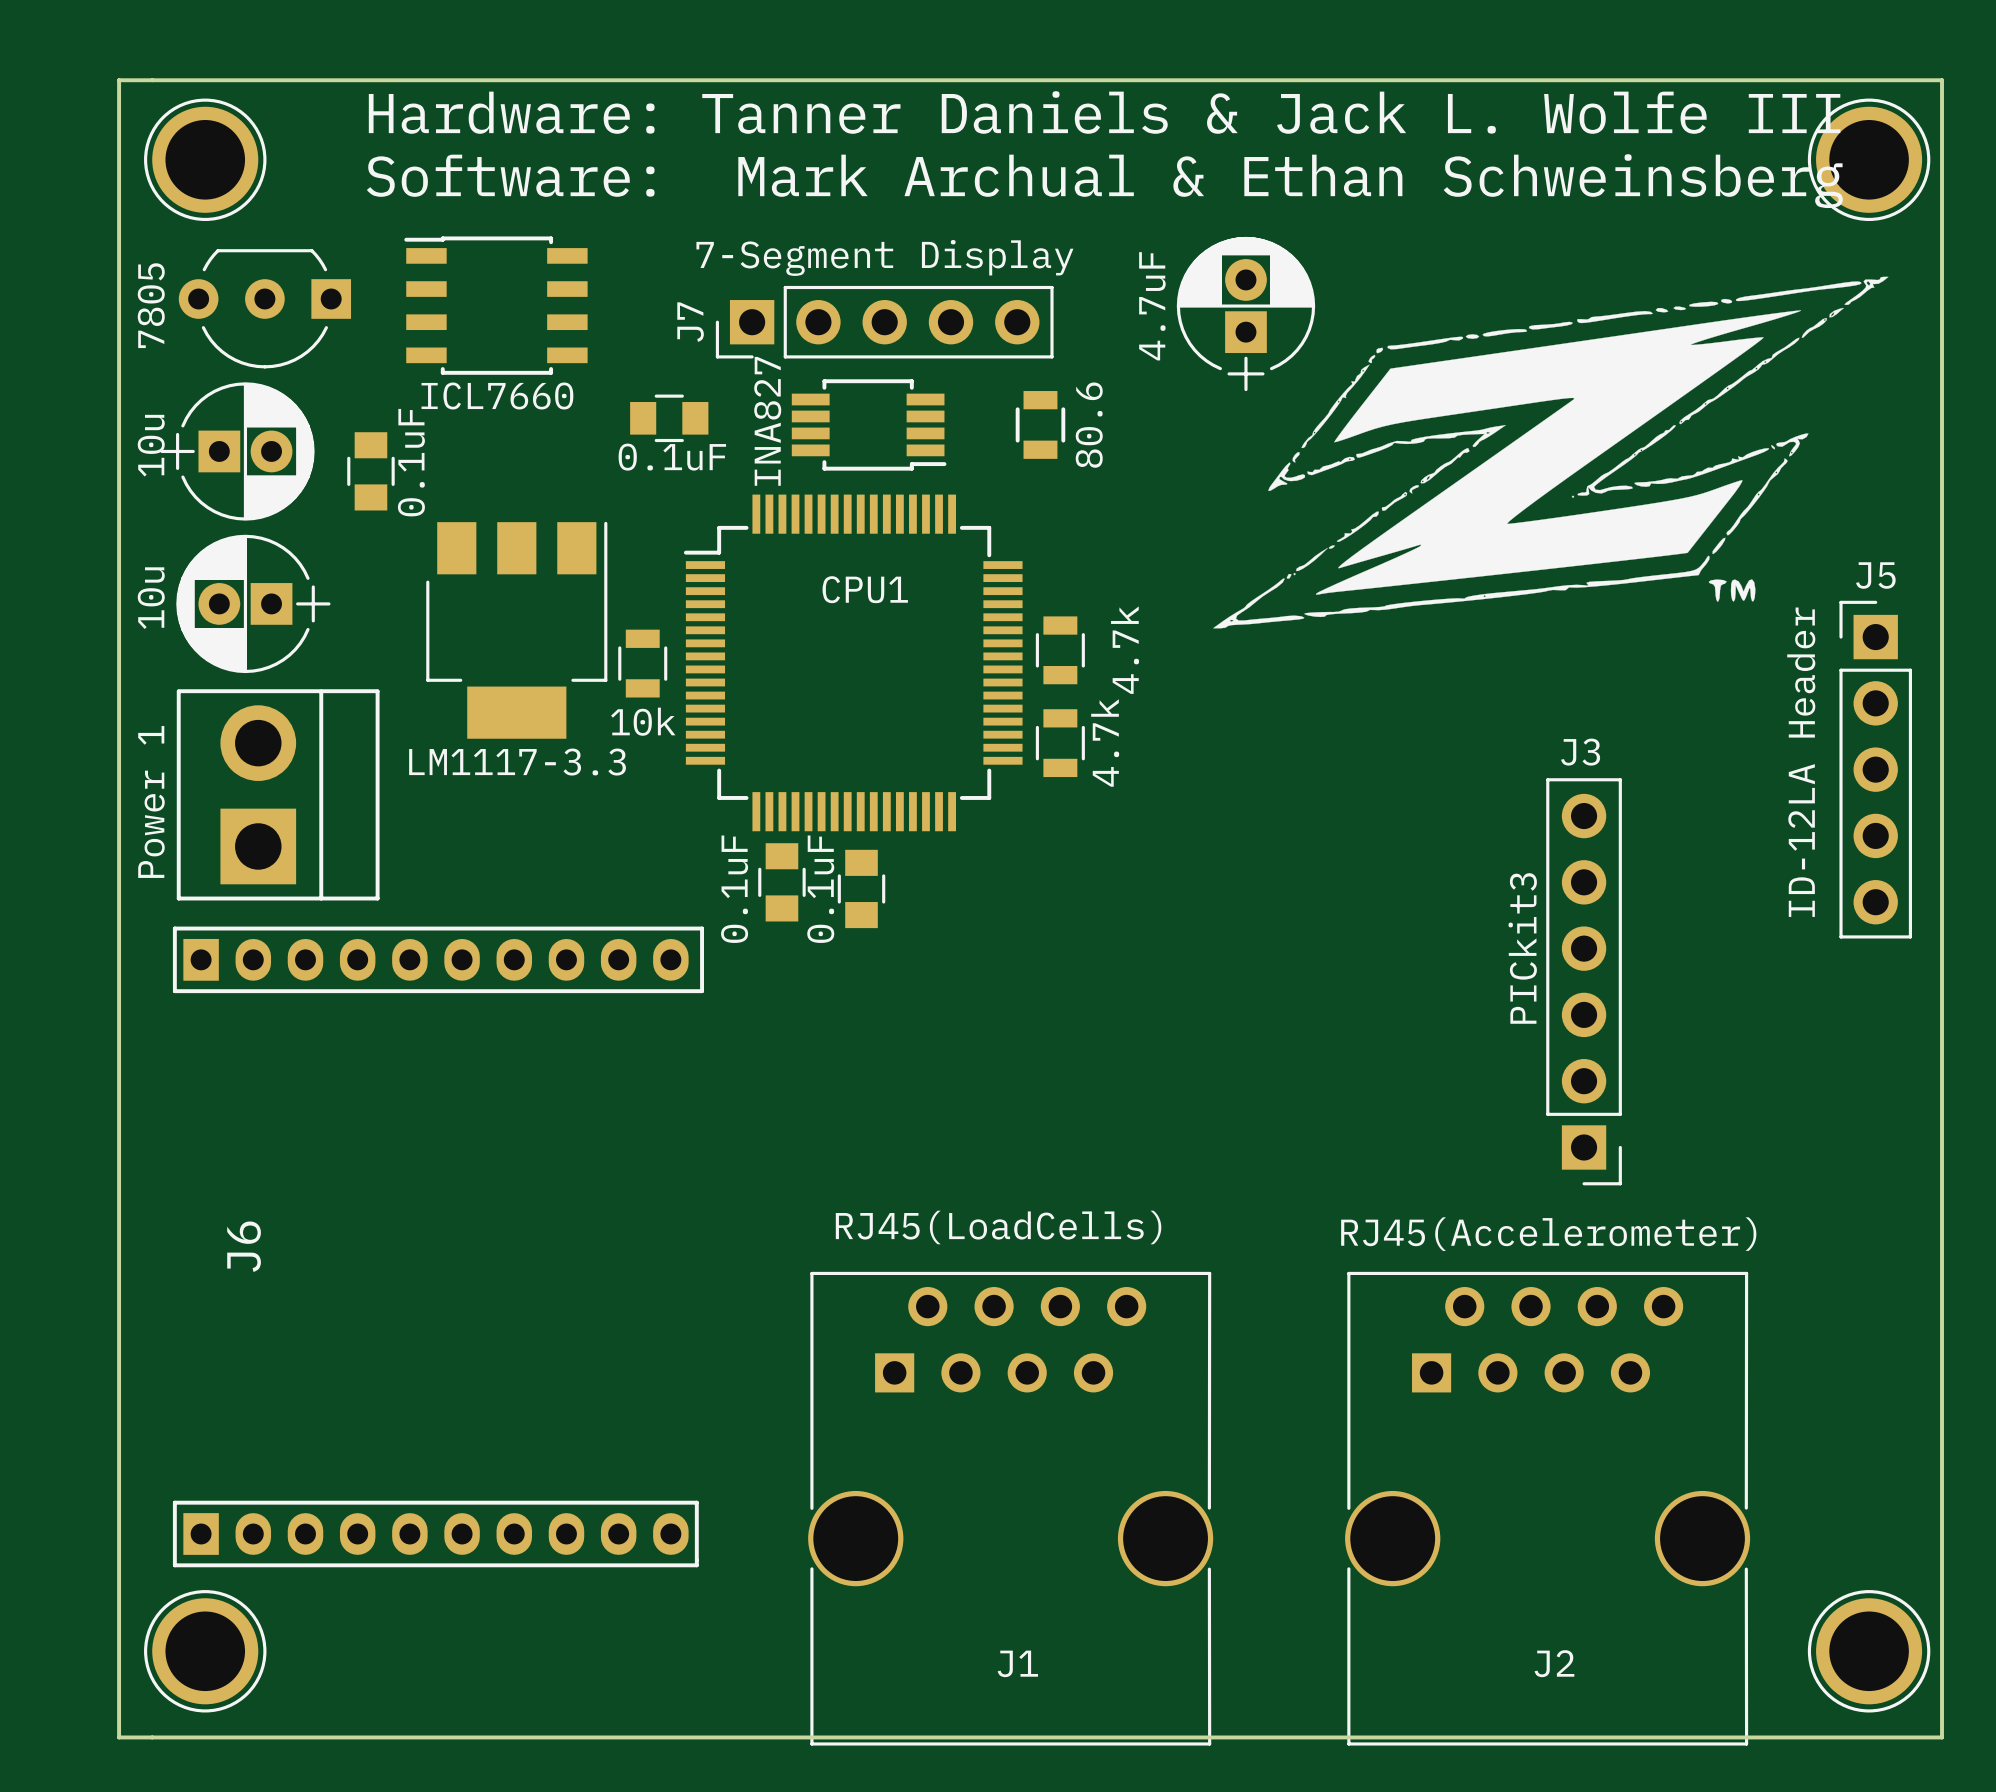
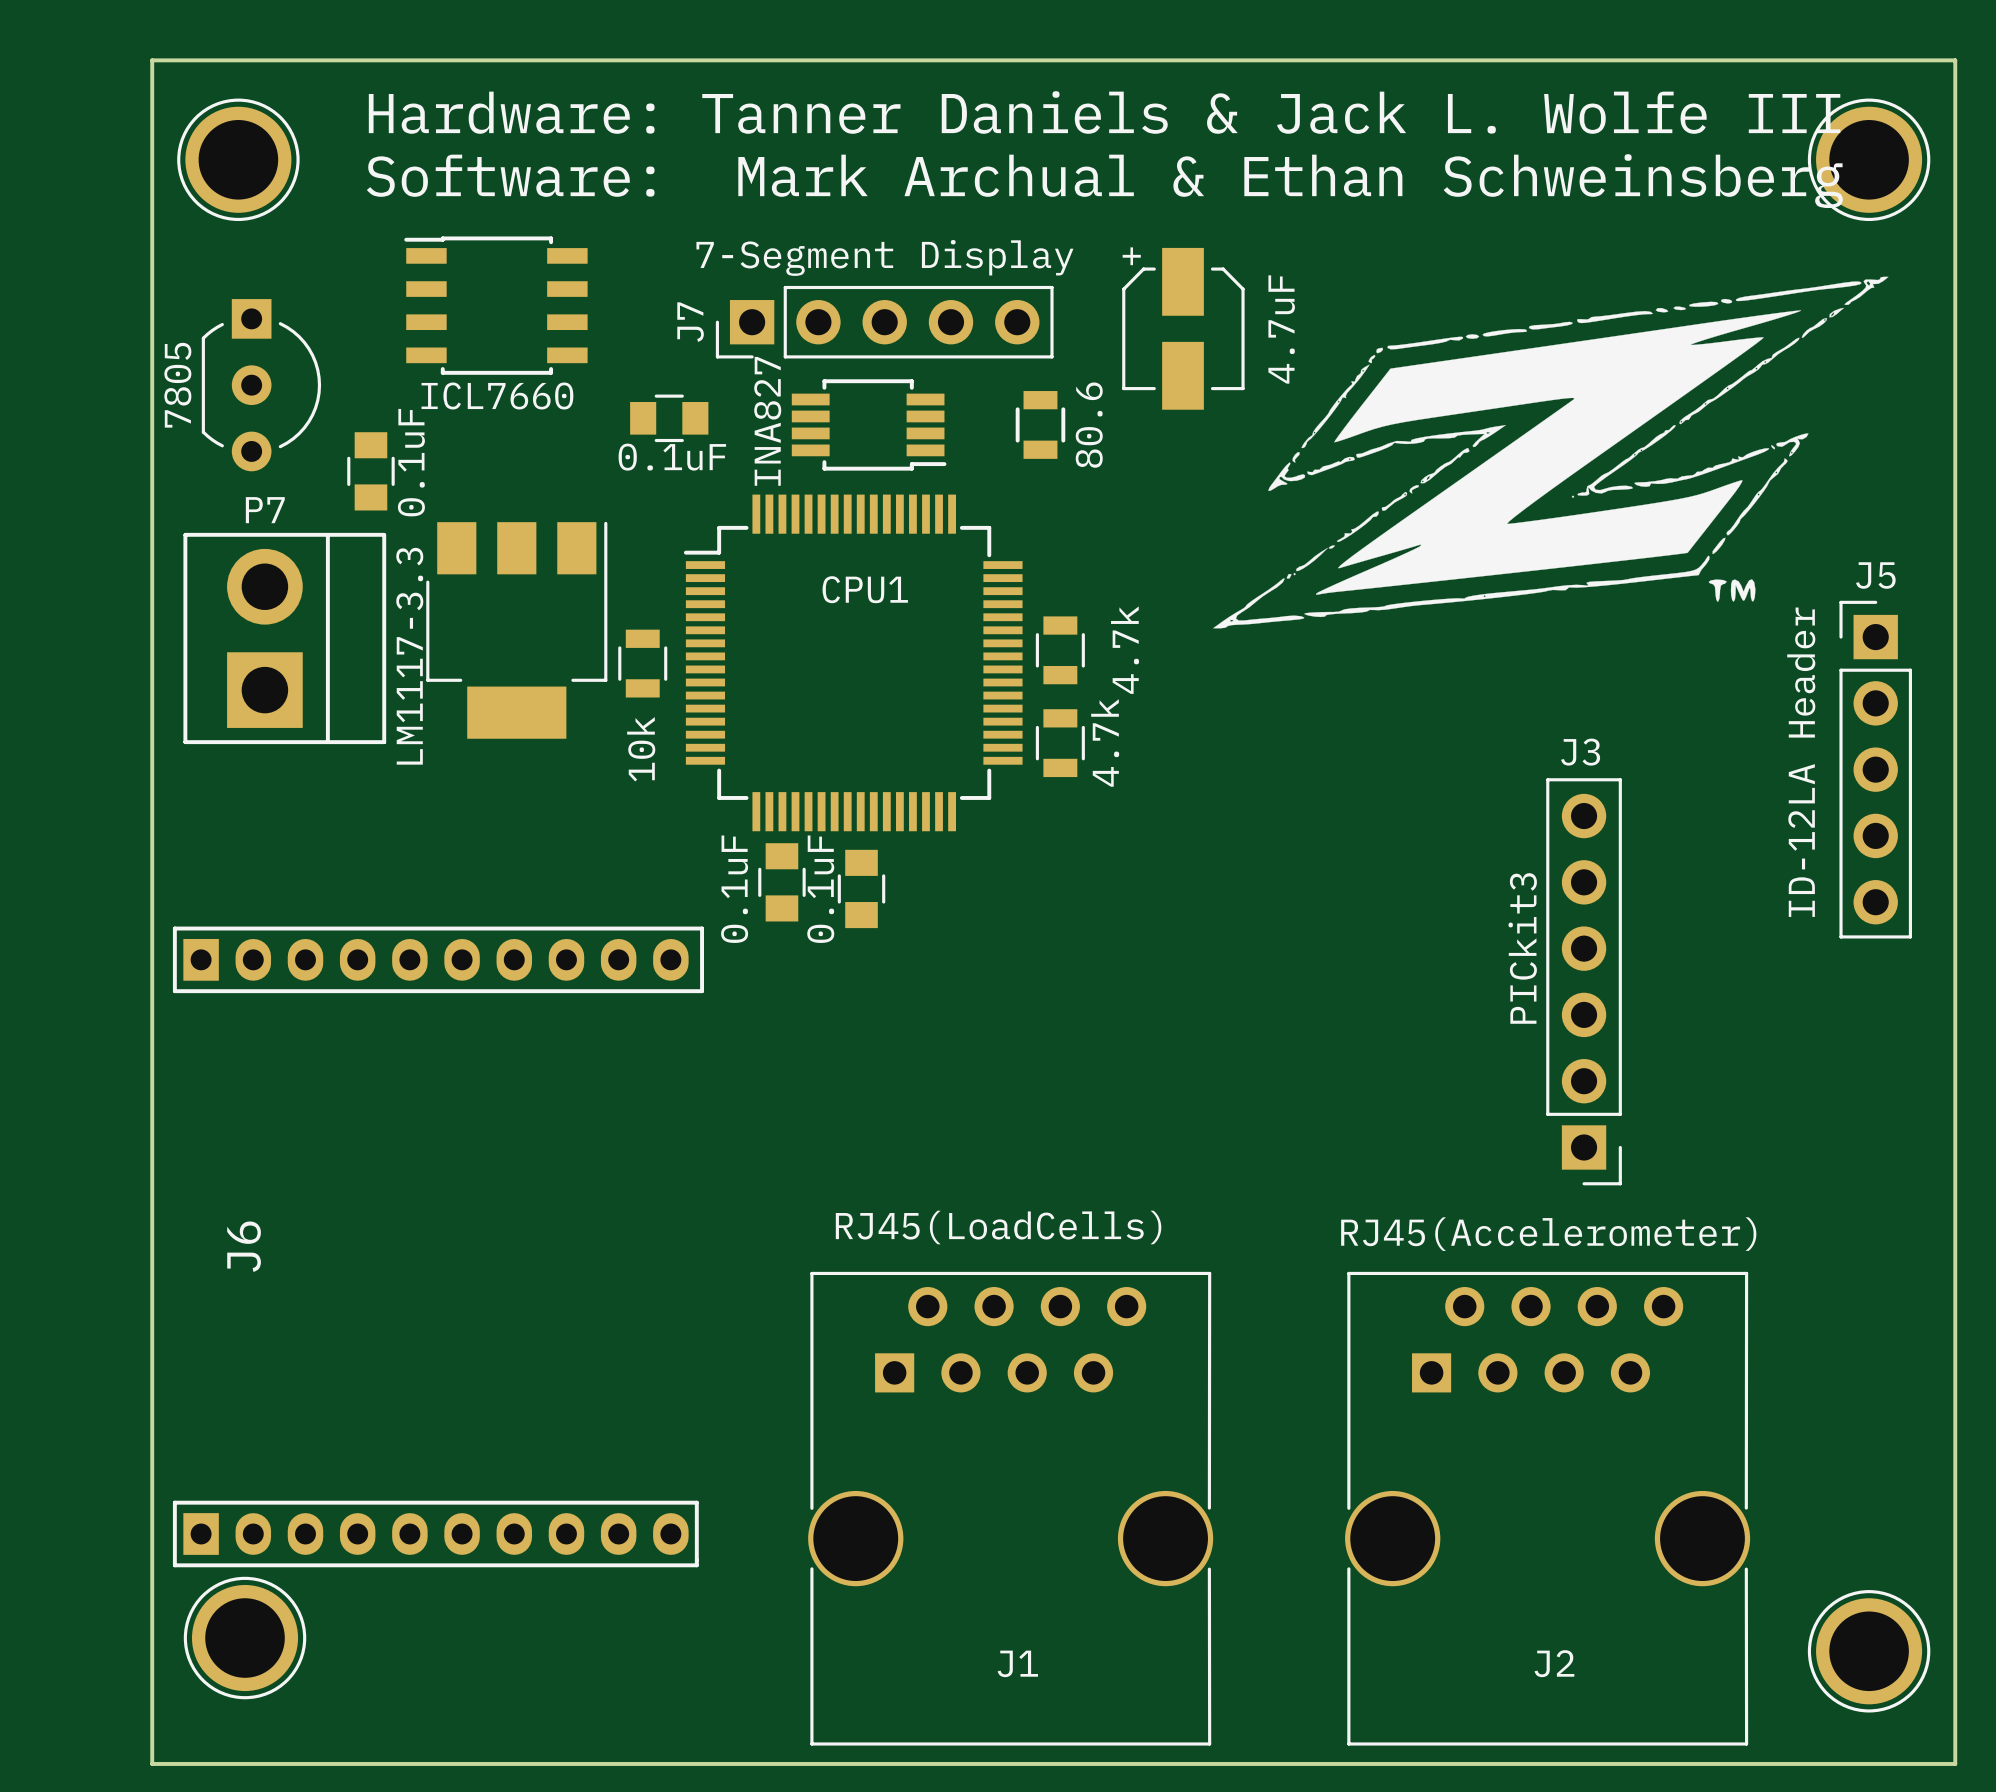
board edge: (119, 80) (119, 1737) (1942, 1737) (1942, 80) (119, 80) -> (152, 60) (152, 1763) (1955, 1763) (1955, 60) (152, 60)
part position: (205, 159) -> (238, 159)
part rotation: 0° (264, 308) -> 90° counterclockwise (261, 385)
part: 4.7uF (1245, 314) -> none
part: none -> 4.7uF (1183, 328)
part: 10u (237, 451) -> none
part: 10u (253, 603) -> none
P7: none -> (284, 638)
part value rotation: 0° (643, 721) -> 90° counterclockwise (641, 749)
part value rotation: 0° (517, 762) -> 90° counterclockwise (409, 656)
part: Power 1 (278, 794) -> none
part position: (205, 1651) -> (245, 1638)

